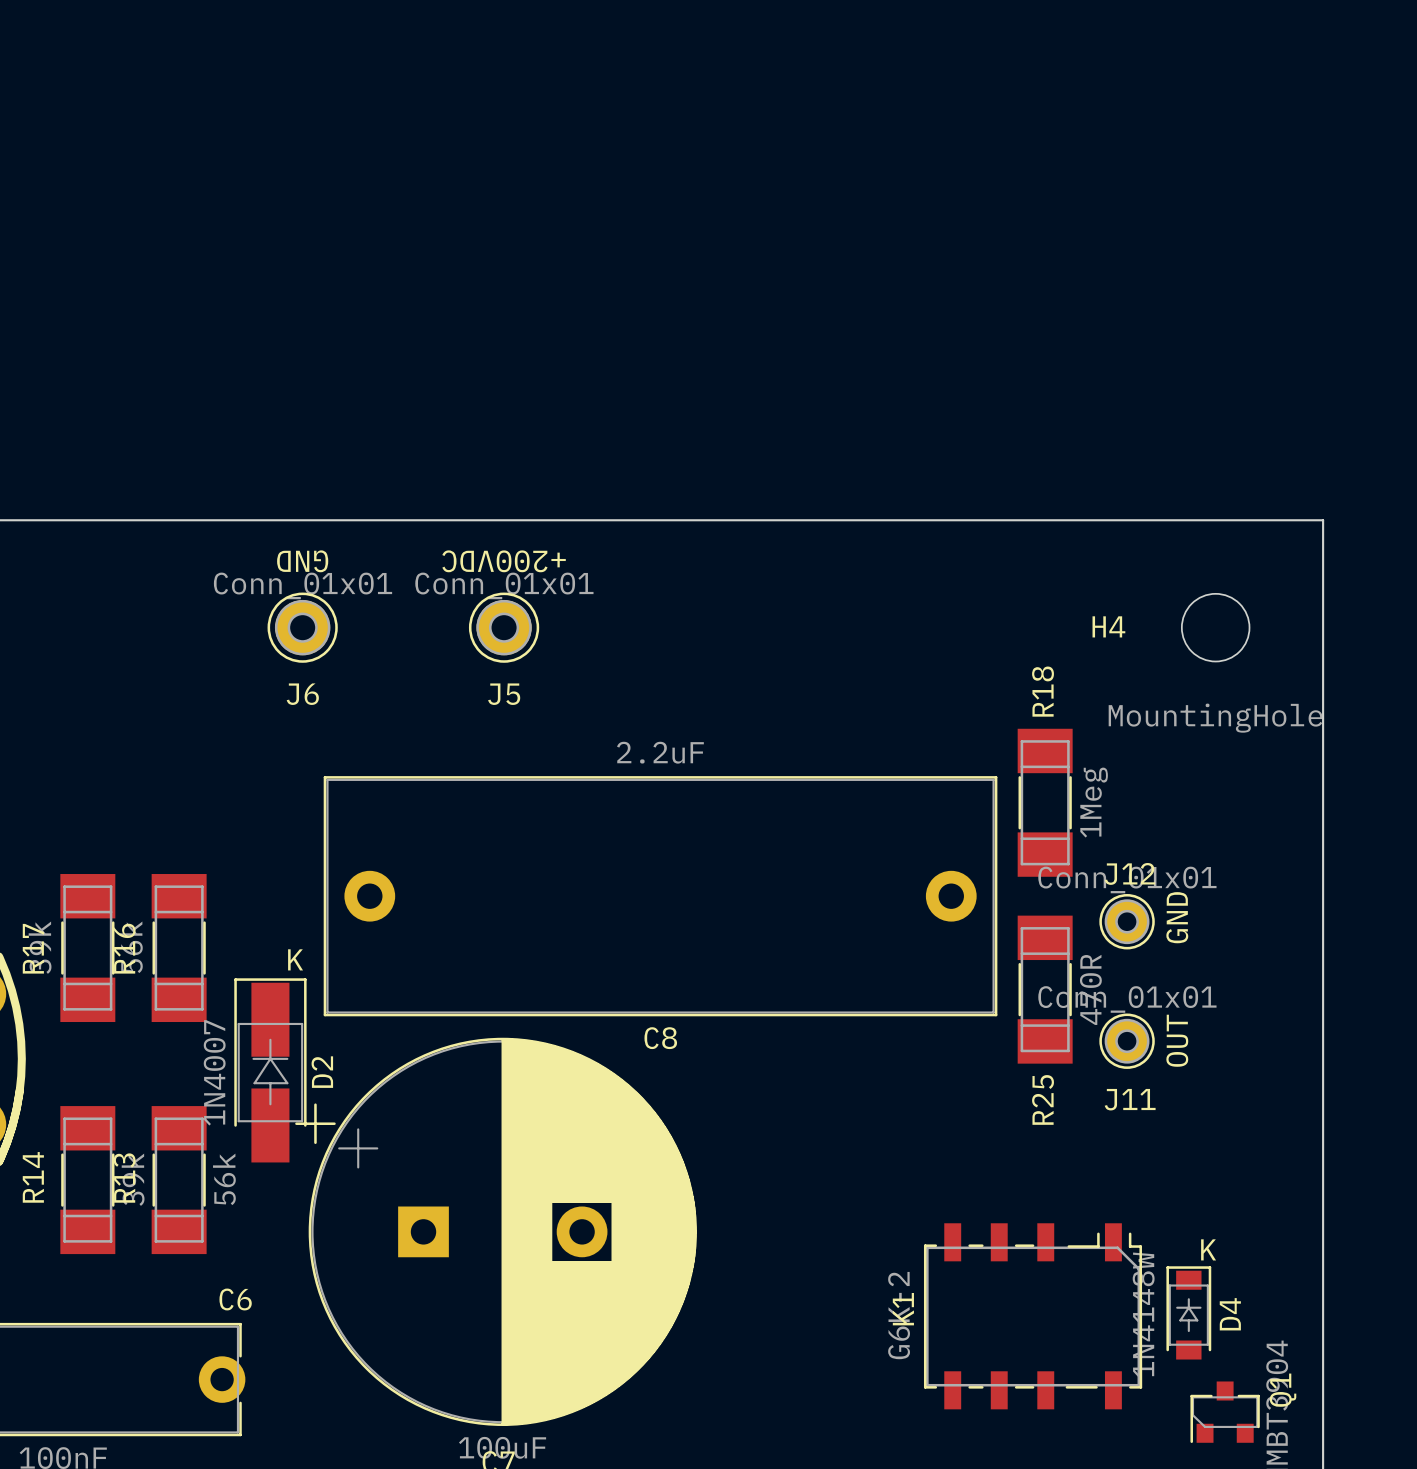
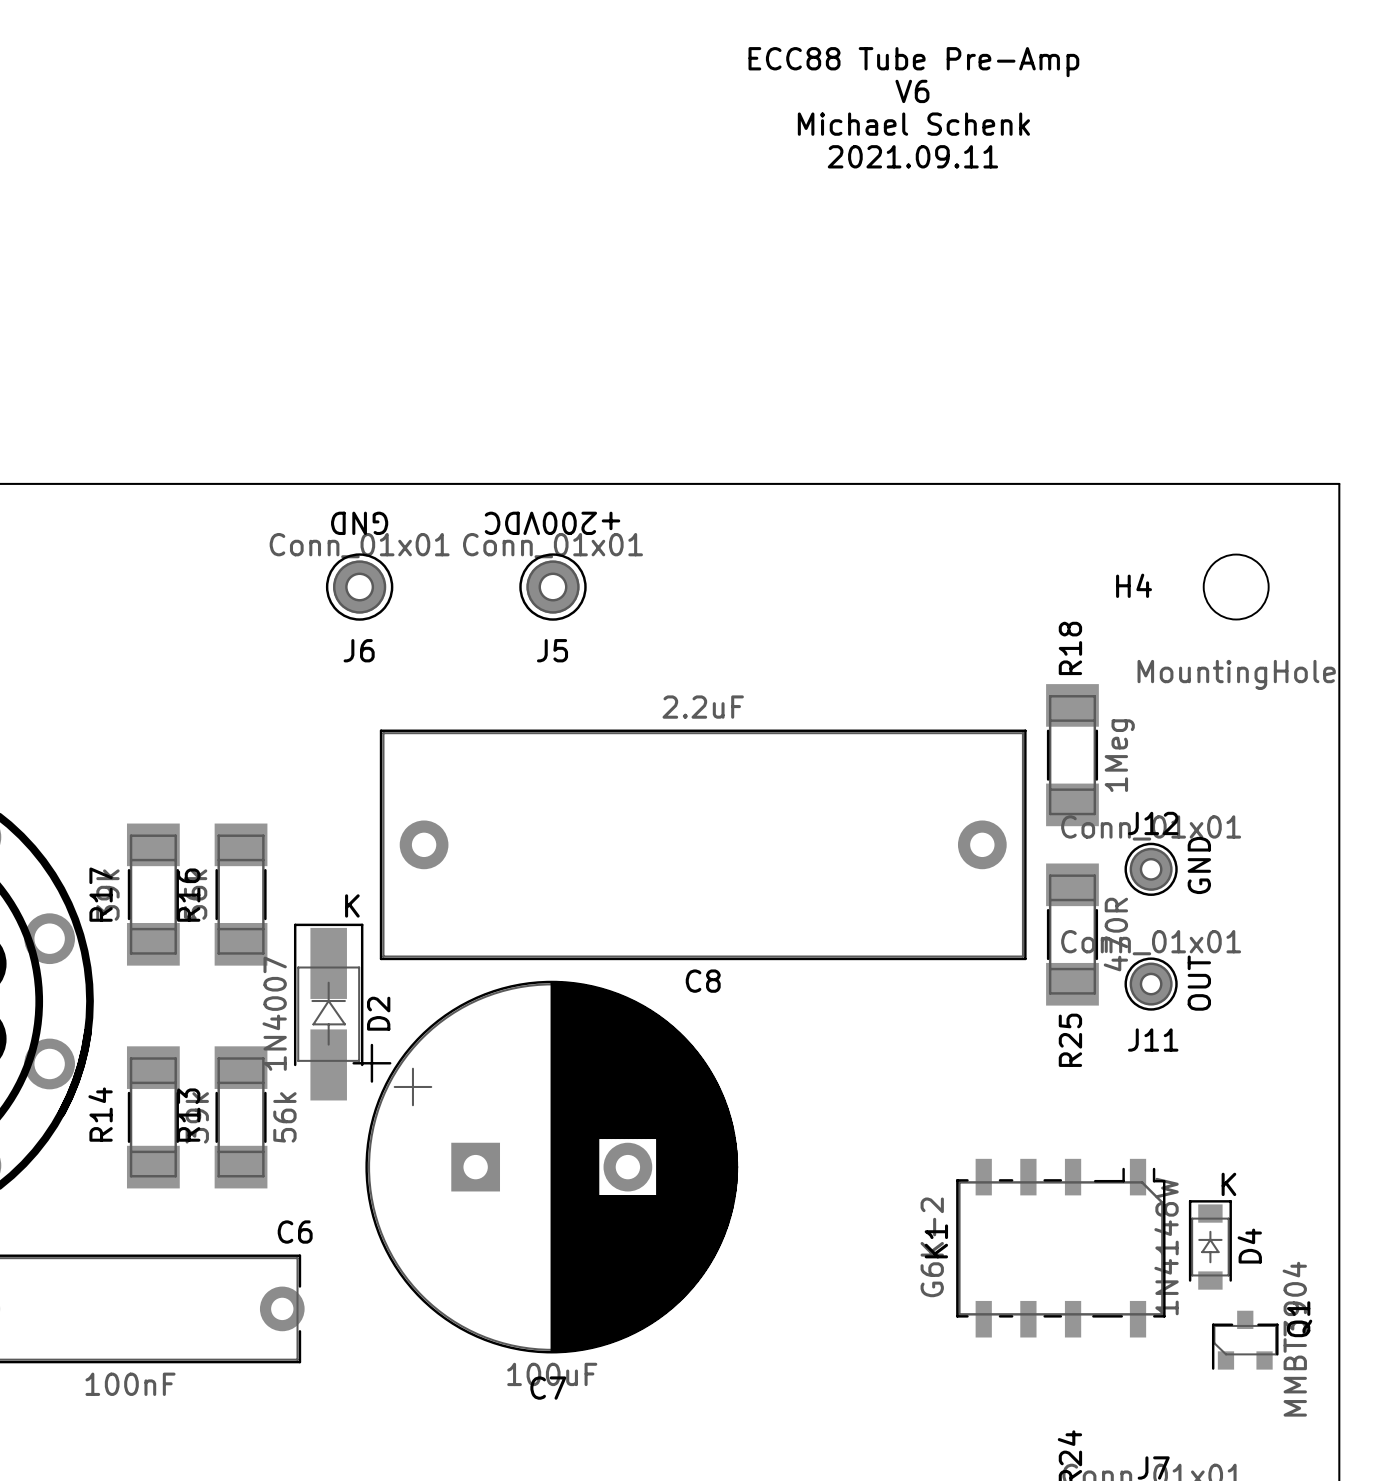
text: none -> ECC88 Tube Pre-Amp (913, 62)
text: none -> V6 (912, 91)
text: none -> Michael Schenk (913, 124)
text: none -> 2021.09.11 (912, 156)

